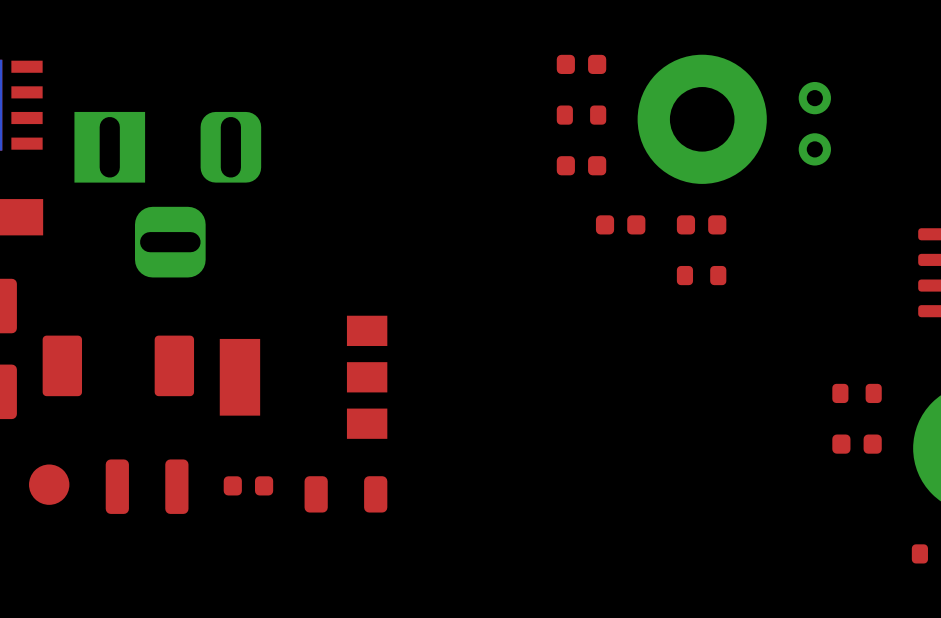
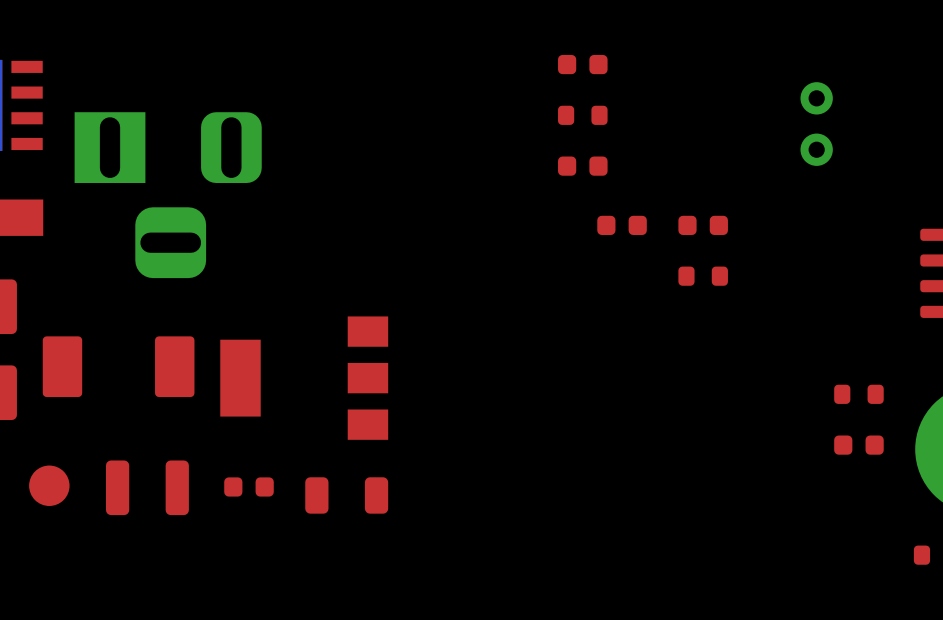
part: (702, 119) -> none

